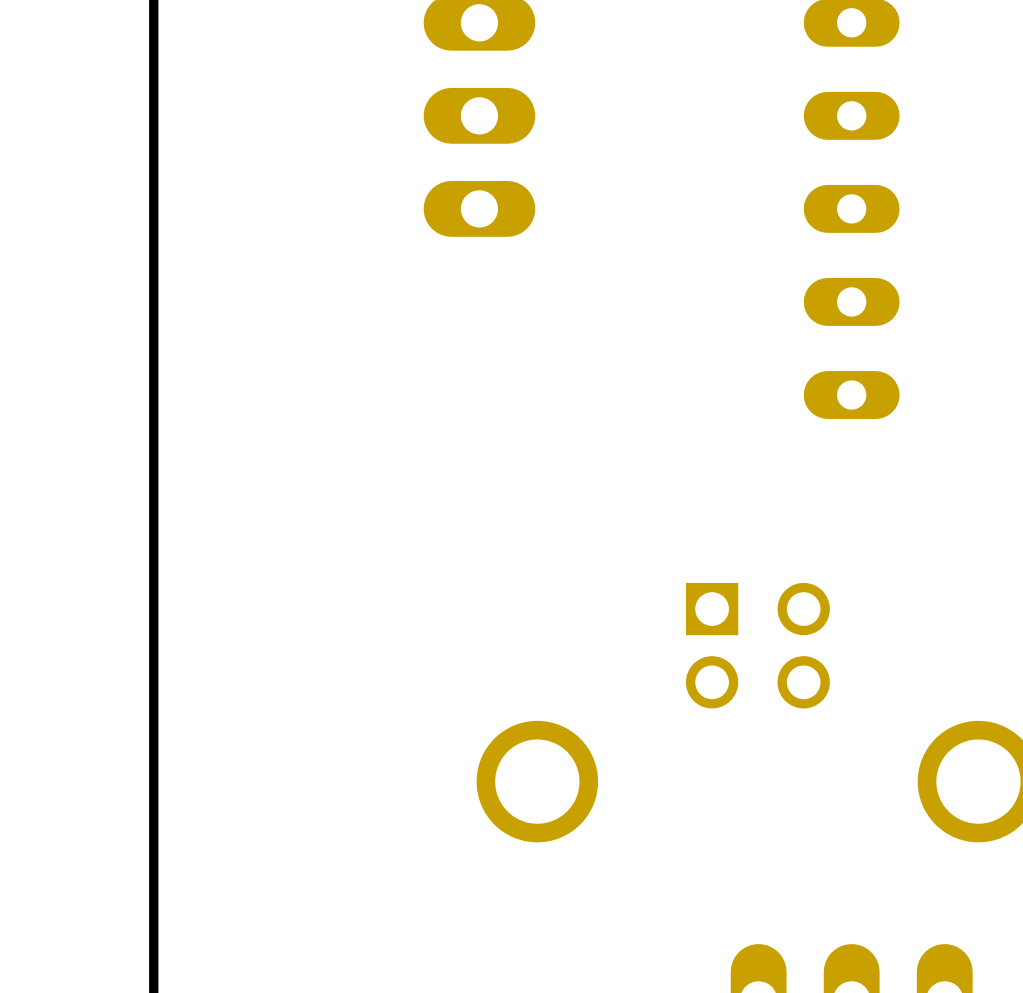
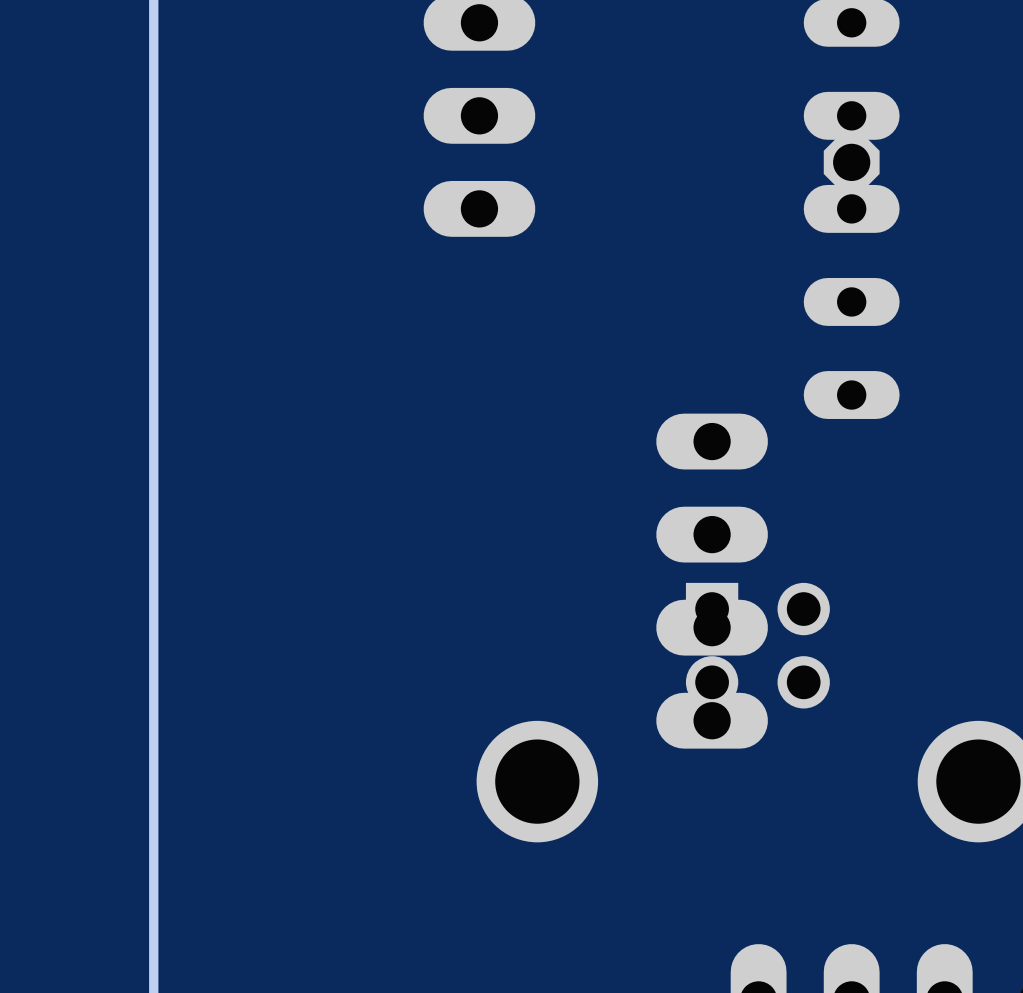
part: none -> (851, 162)
part: none -> (712, 581)

